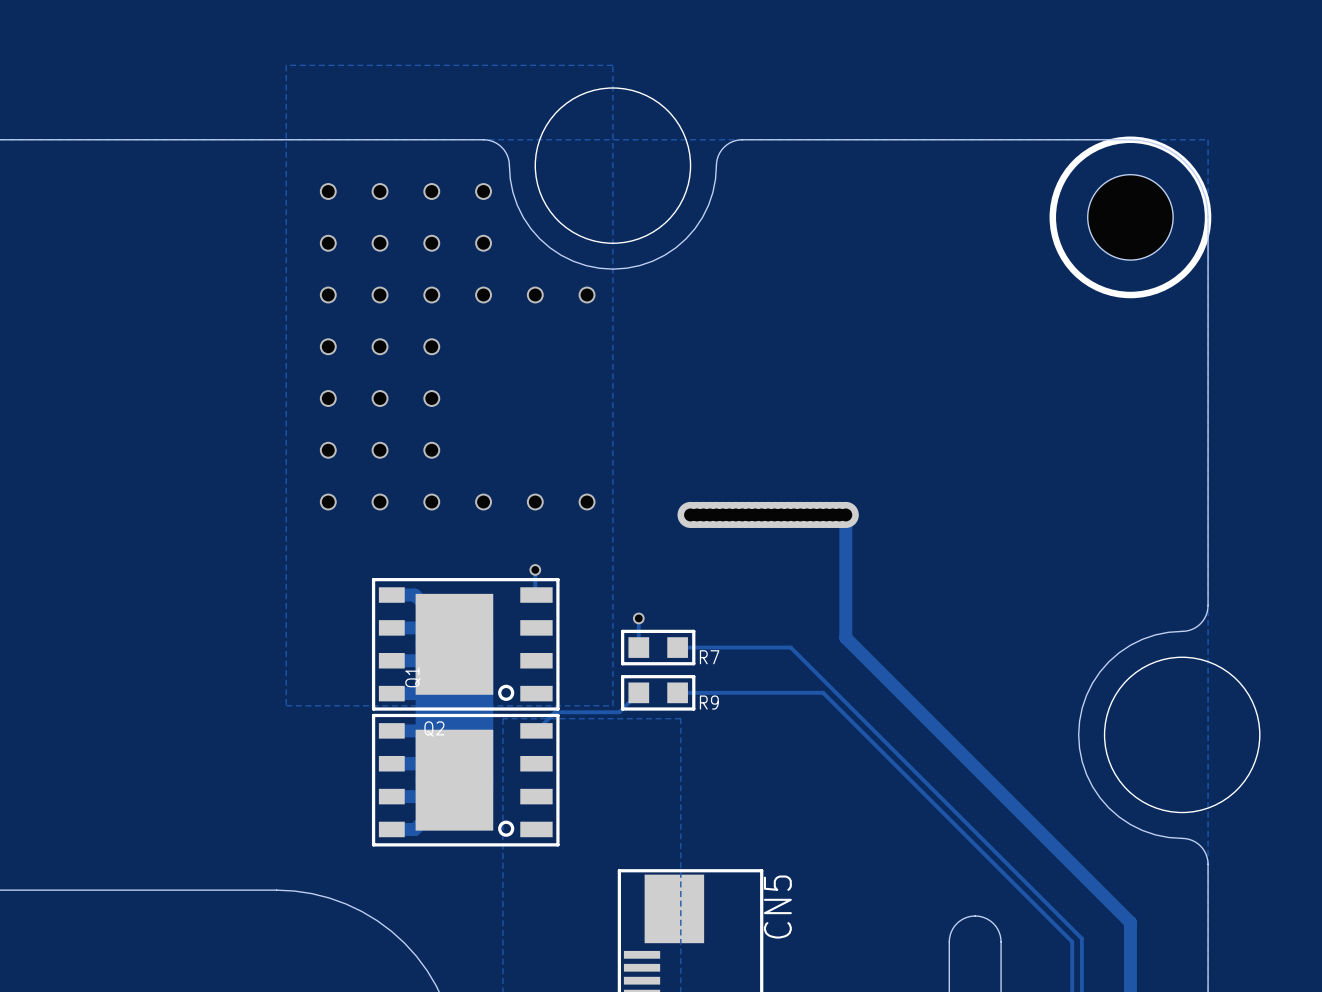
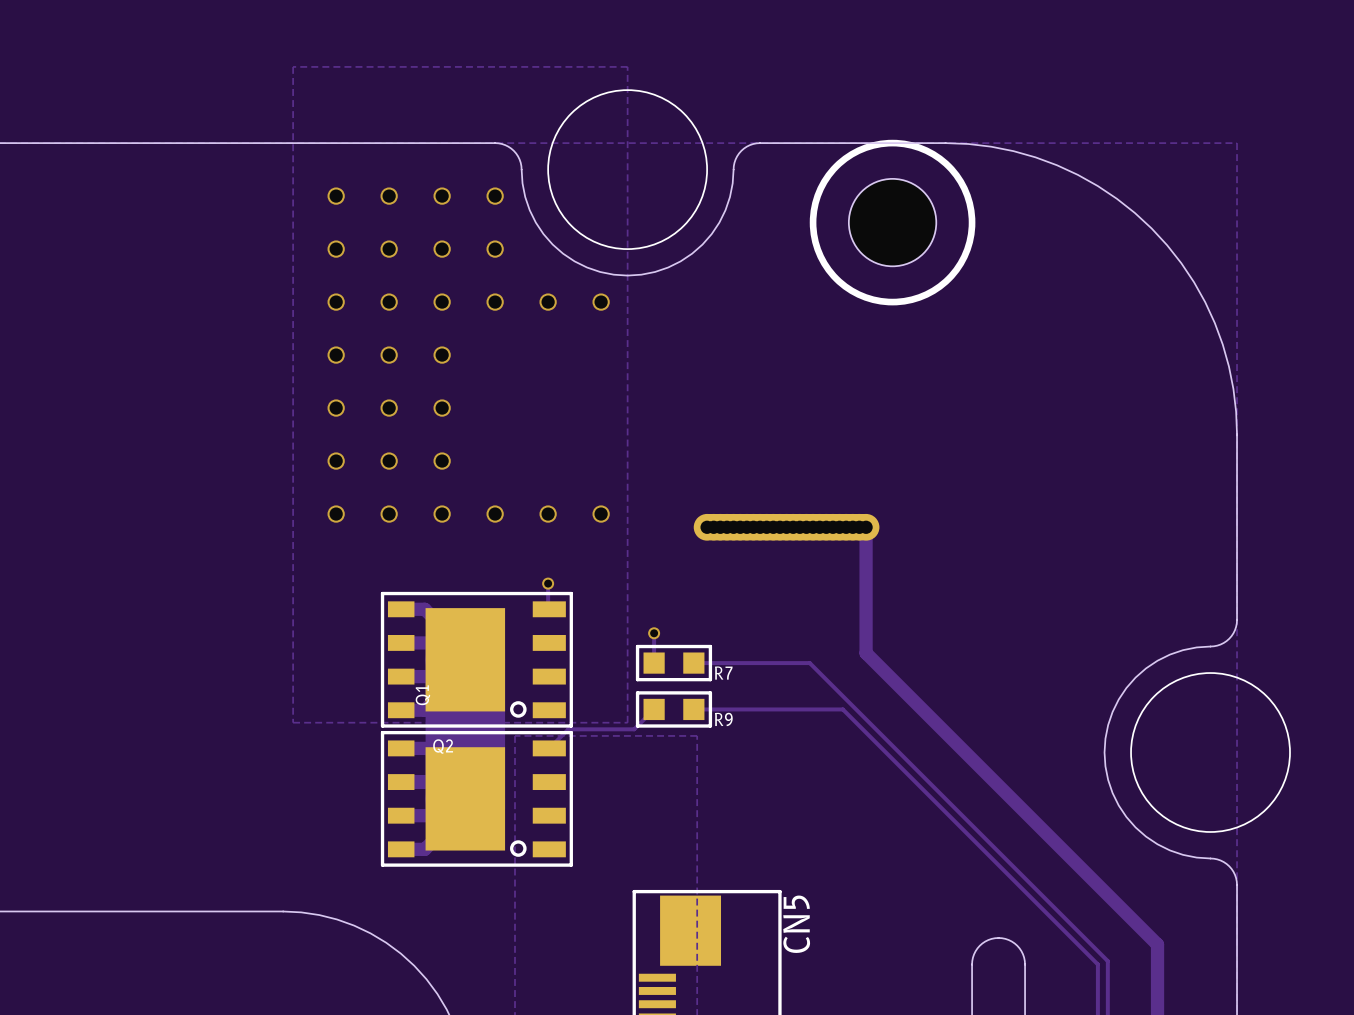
board edge: (923, 139) (1140, 140) (1169, 150) (1185, 162) (1197, 178) (1207, 207) (1208, 424) -> (945, 143) (991, 146) (1013, 151) (1057, 165) (1077, 174) (1116, 198) (1151, 228) (1181, 263) (1205, 302) (1214, 323) (1228, 366) (1233, 388) (1237, 434)
part position: (1130, 217) -> (892, 222)

